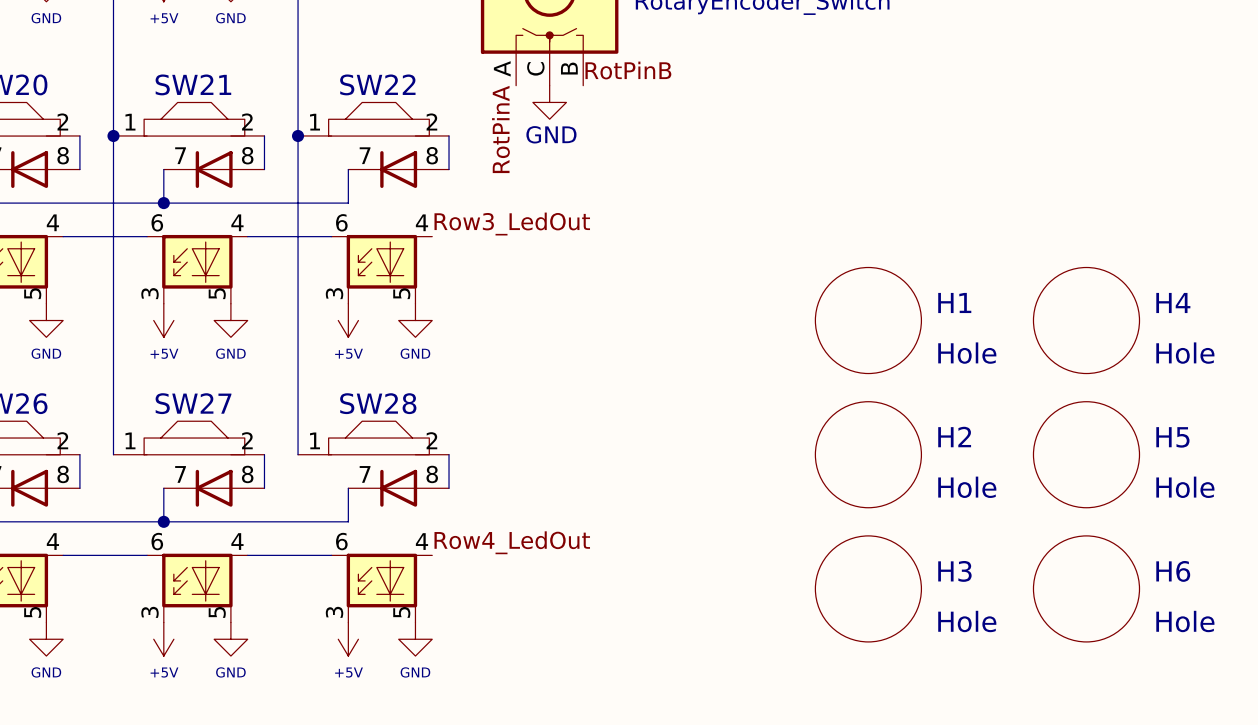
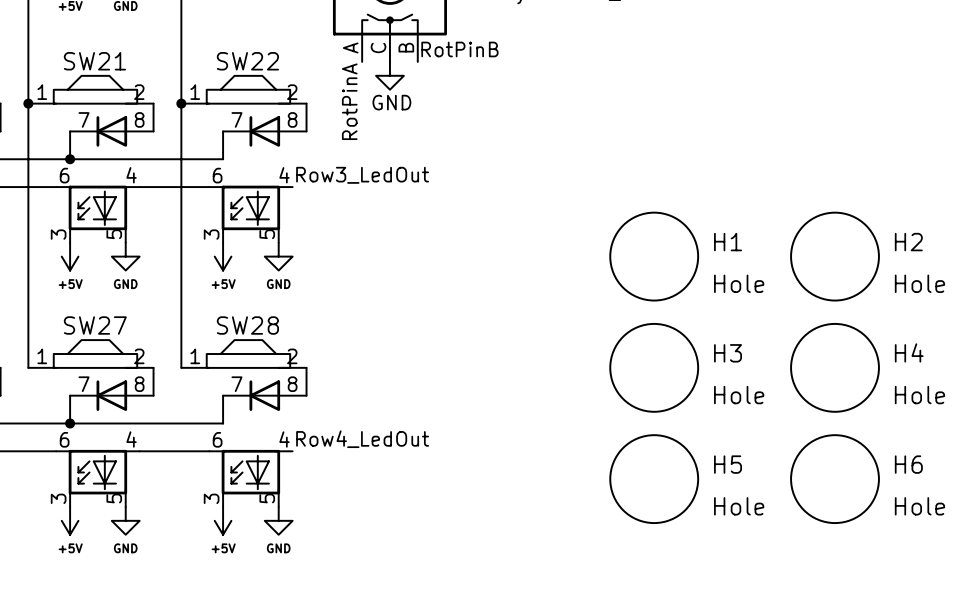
H4 name: H4 (1173, 302) -> H2 (908, 242)
H2 name: H2 (954, 437) -> H3 (728, 353)
H5 name: H5 (1172, 437) -> H4 (909, 352)
H3 name: H3 (954, 571) -> H5 (728, 464)

